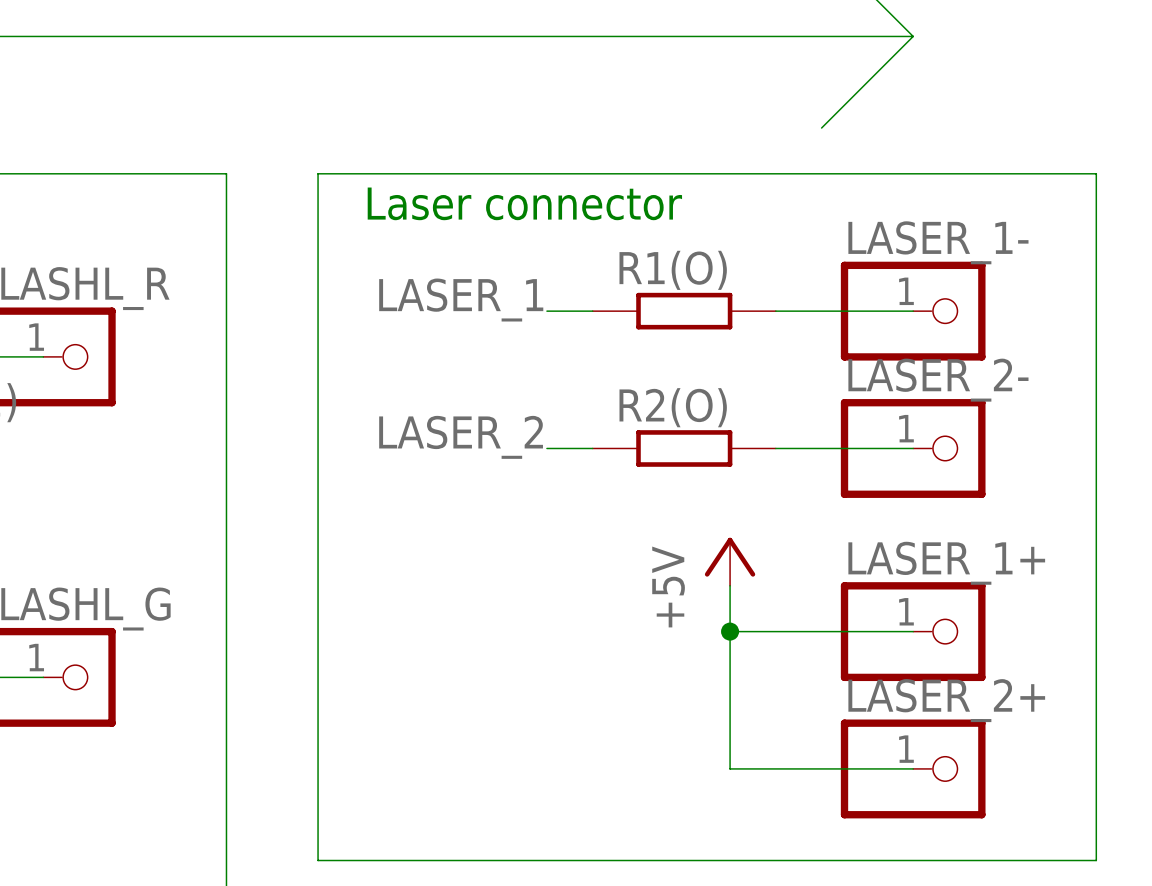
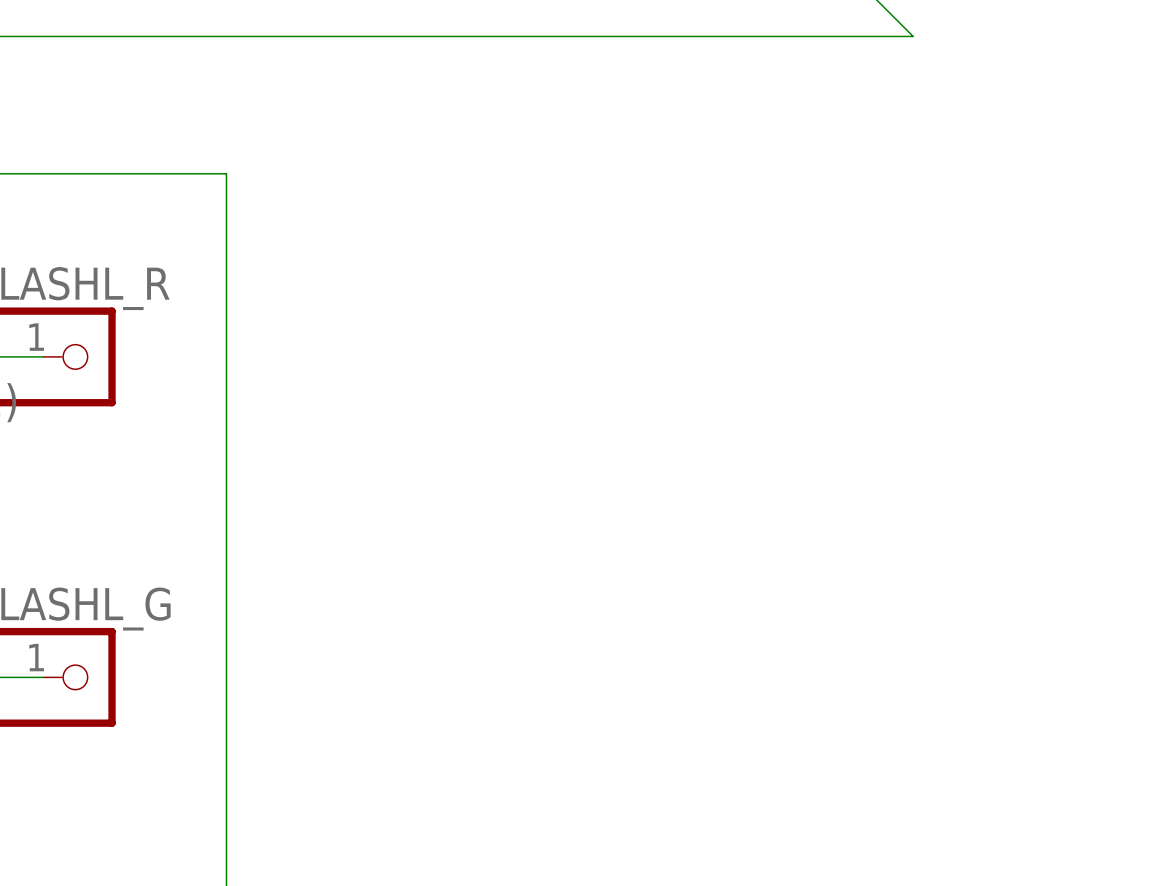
wire: (913, 36) (821, 128) -> none
wire: (318, 173) (318, 860) (1096, 860) (1096, 173) (318, 173) -> none
text: Laser connector (524, 203) -> none
label: LASER_1 (461, 300) -> none
wire: (546, 311) (592, 311) -> none
R1(O): (684, 311) -> none
wire: (775, 311) (913, 311) -> none
LASER_1-: (913, 311) -> none
label: LASER_2 (461, 437) -> none
wire: (546, 448) (592, 448) -> none
R2(O): (684, 448) -> none
wire: (775, 448) (913, 448) -> none
LASER_2-: (913, 448) -> none
power symbol: +5V (730, 561) -> none
wire: (730, 585) (730, 768) (913, 768) -> none
wire: (730, 631) (913, 631) -> none
junction: (730, 631) -> none
LASER_1+: (913, 631) -> none
LASER_2+: (913, 768) -> none

